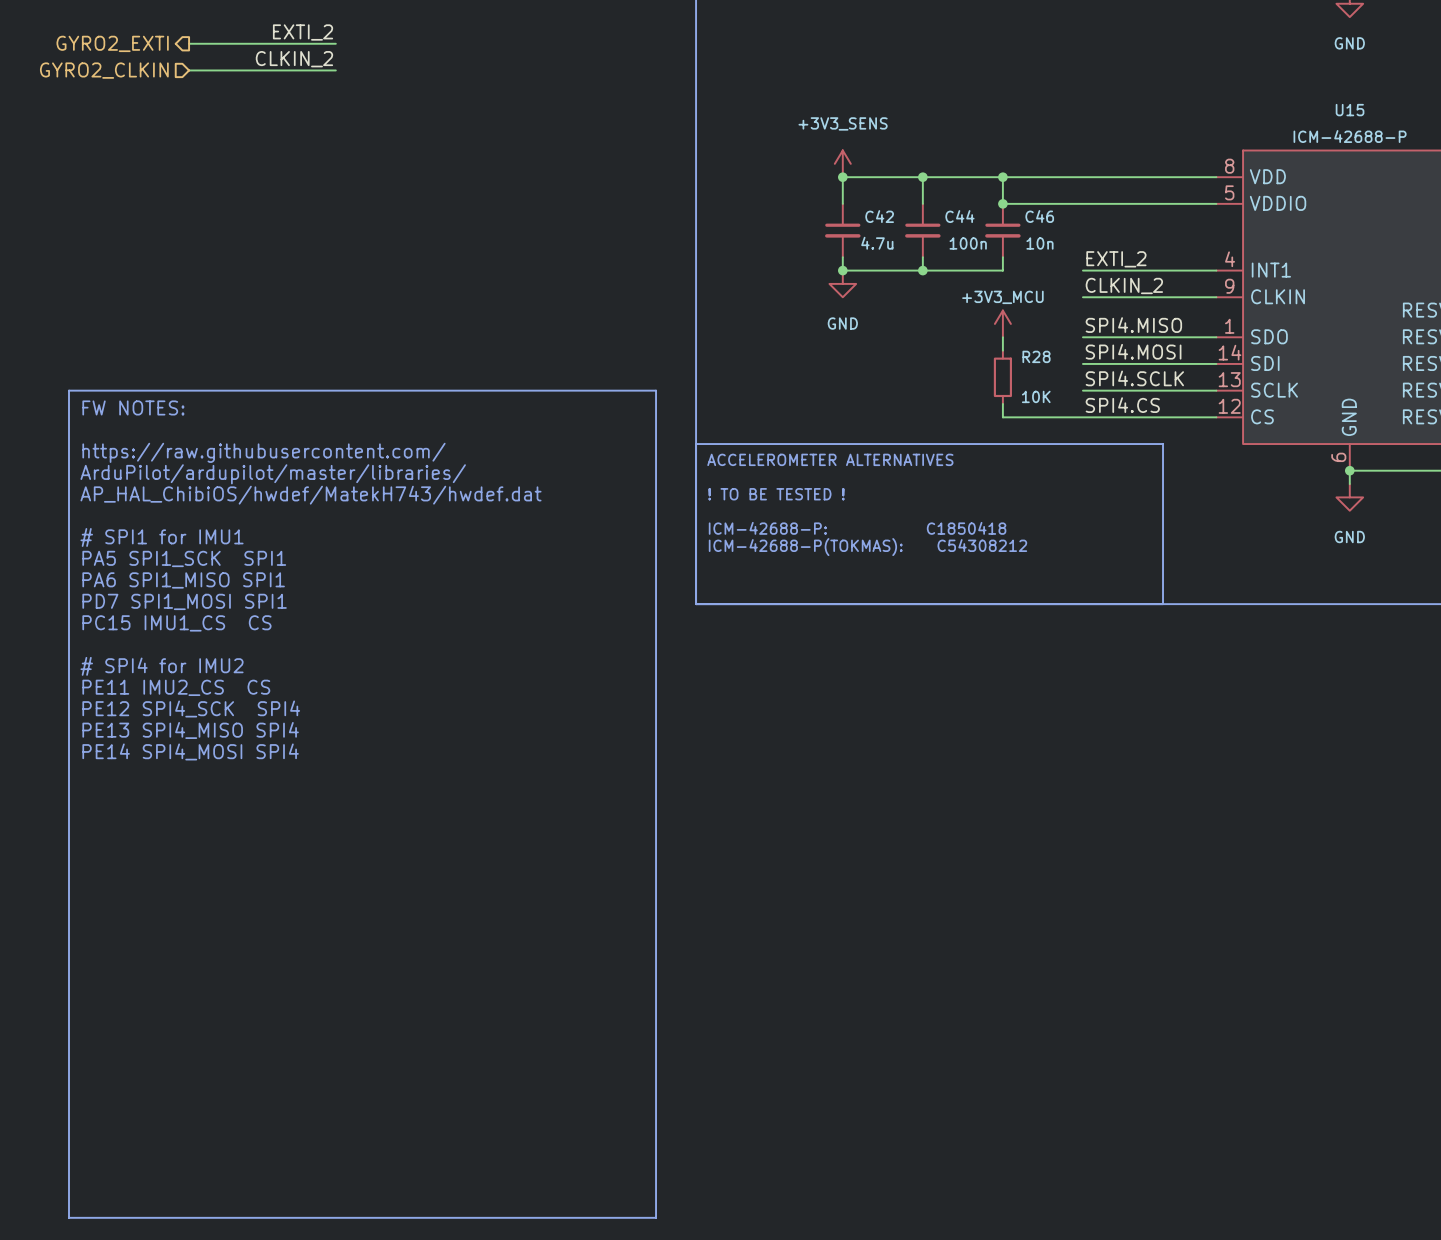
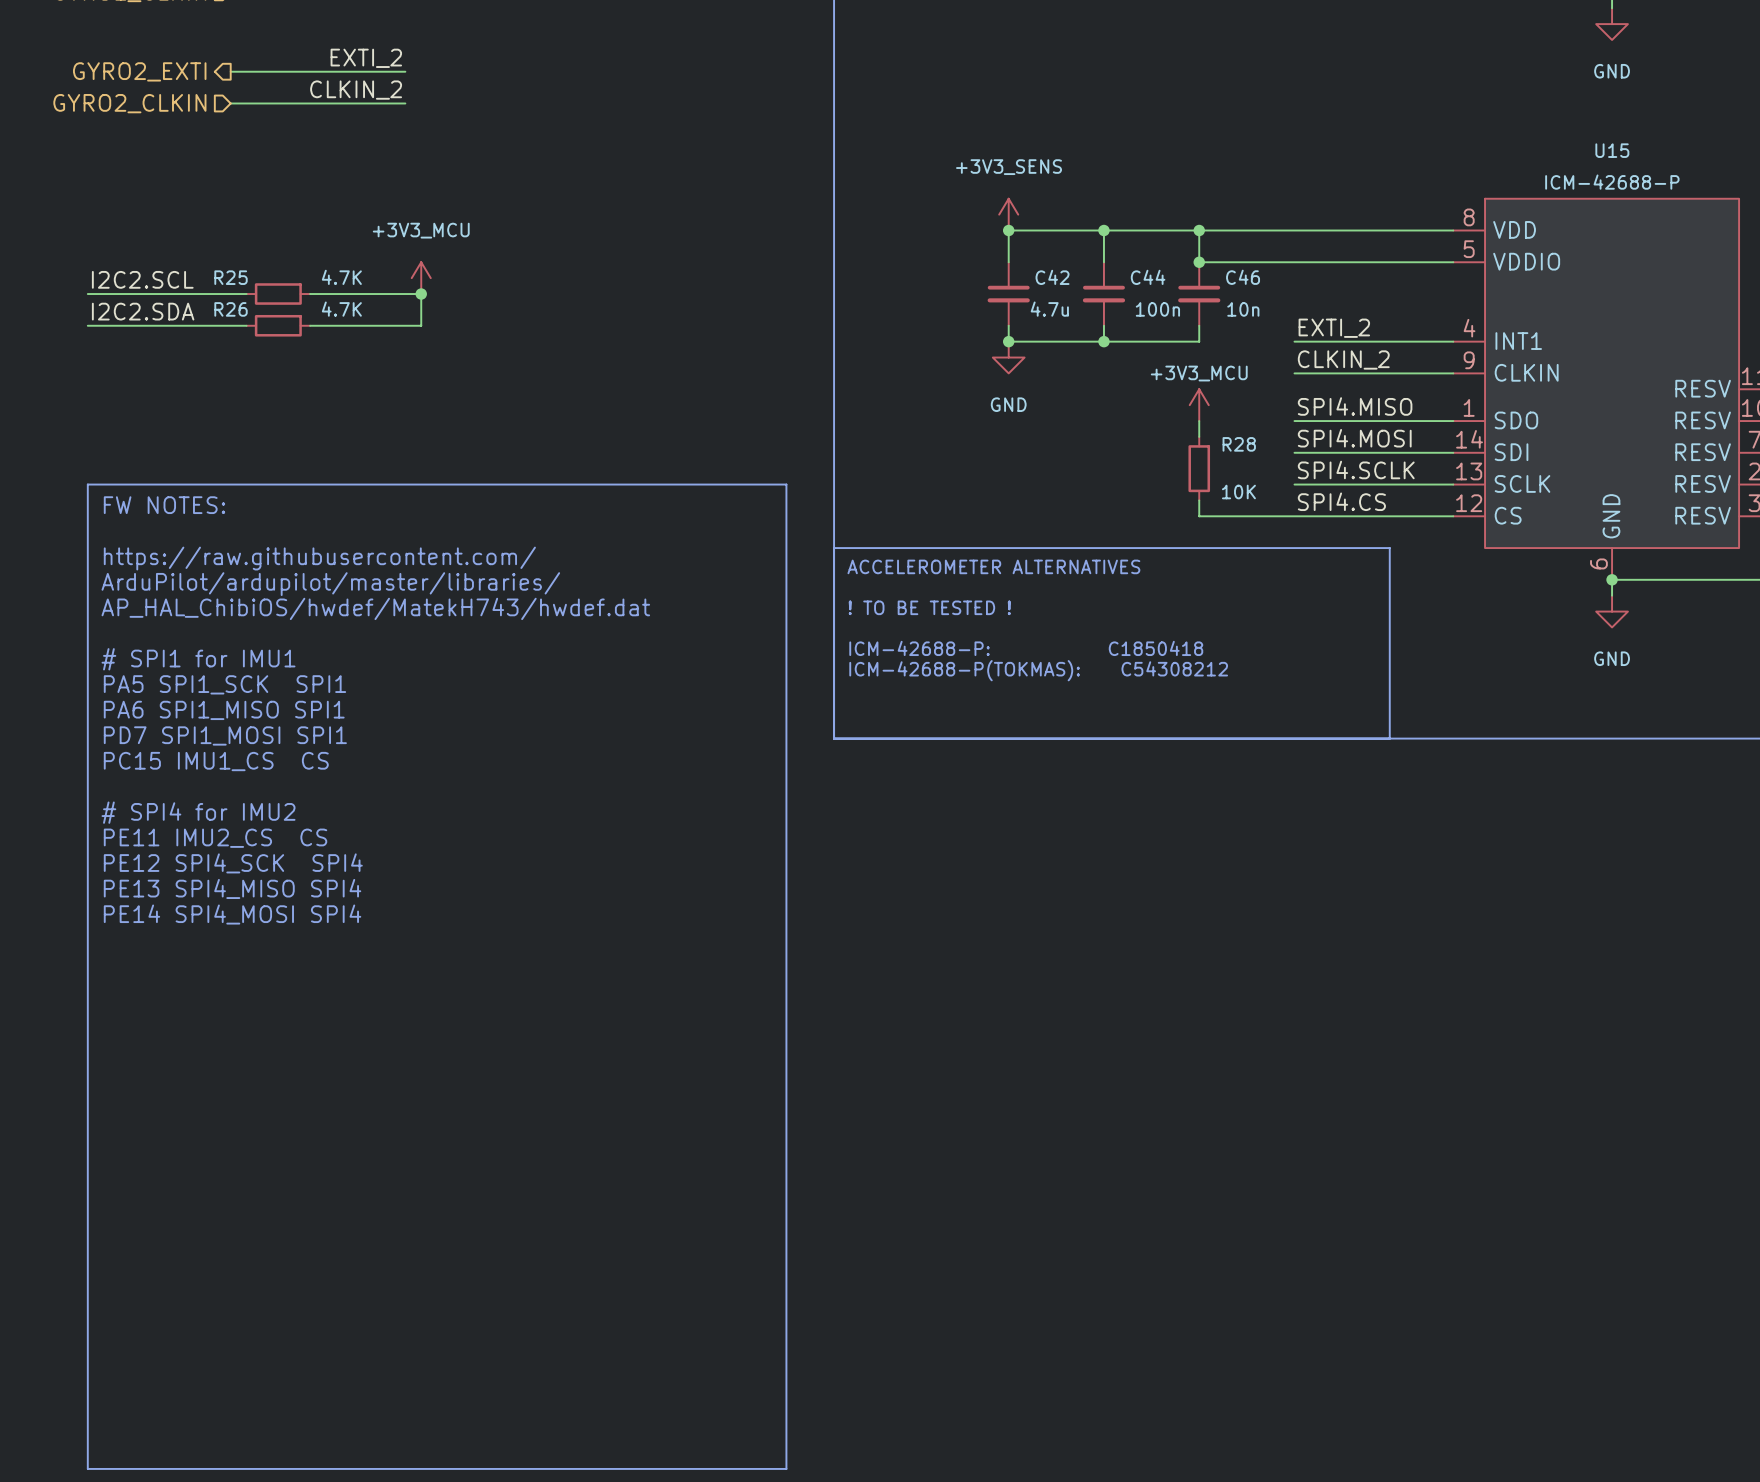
power symbol: none -> +3V3_MCU (421, 278)
label: none -> I2C2.SCL (142, 279)
wire: none -> (87, 294) (246, 294)
R25: none -> 4.7K (278, 294)
wire: none -> (310, 294) (421, 294) (421, 325) (310, 325)
junction: none -> (421, 294)
label: none -> I2C2.SDA (143, 311)
wire: none -> (87, 325) (246, 325)
R26: none -> 4.7K (278, 325)

